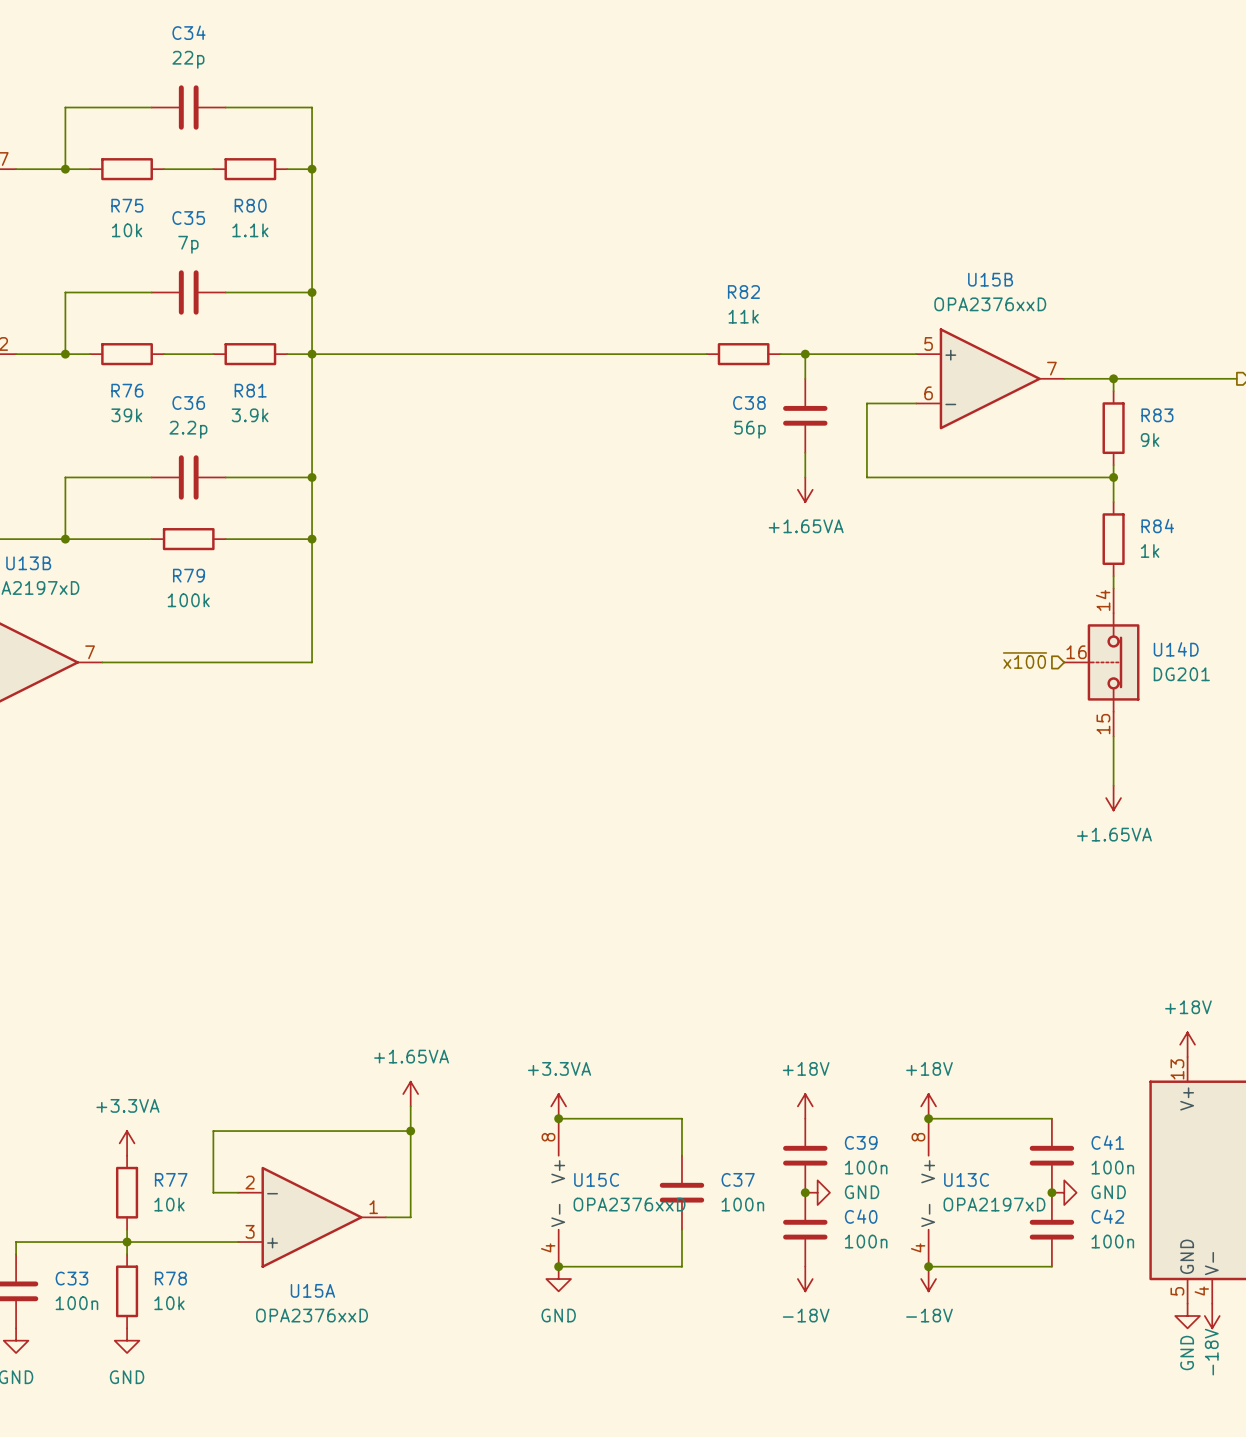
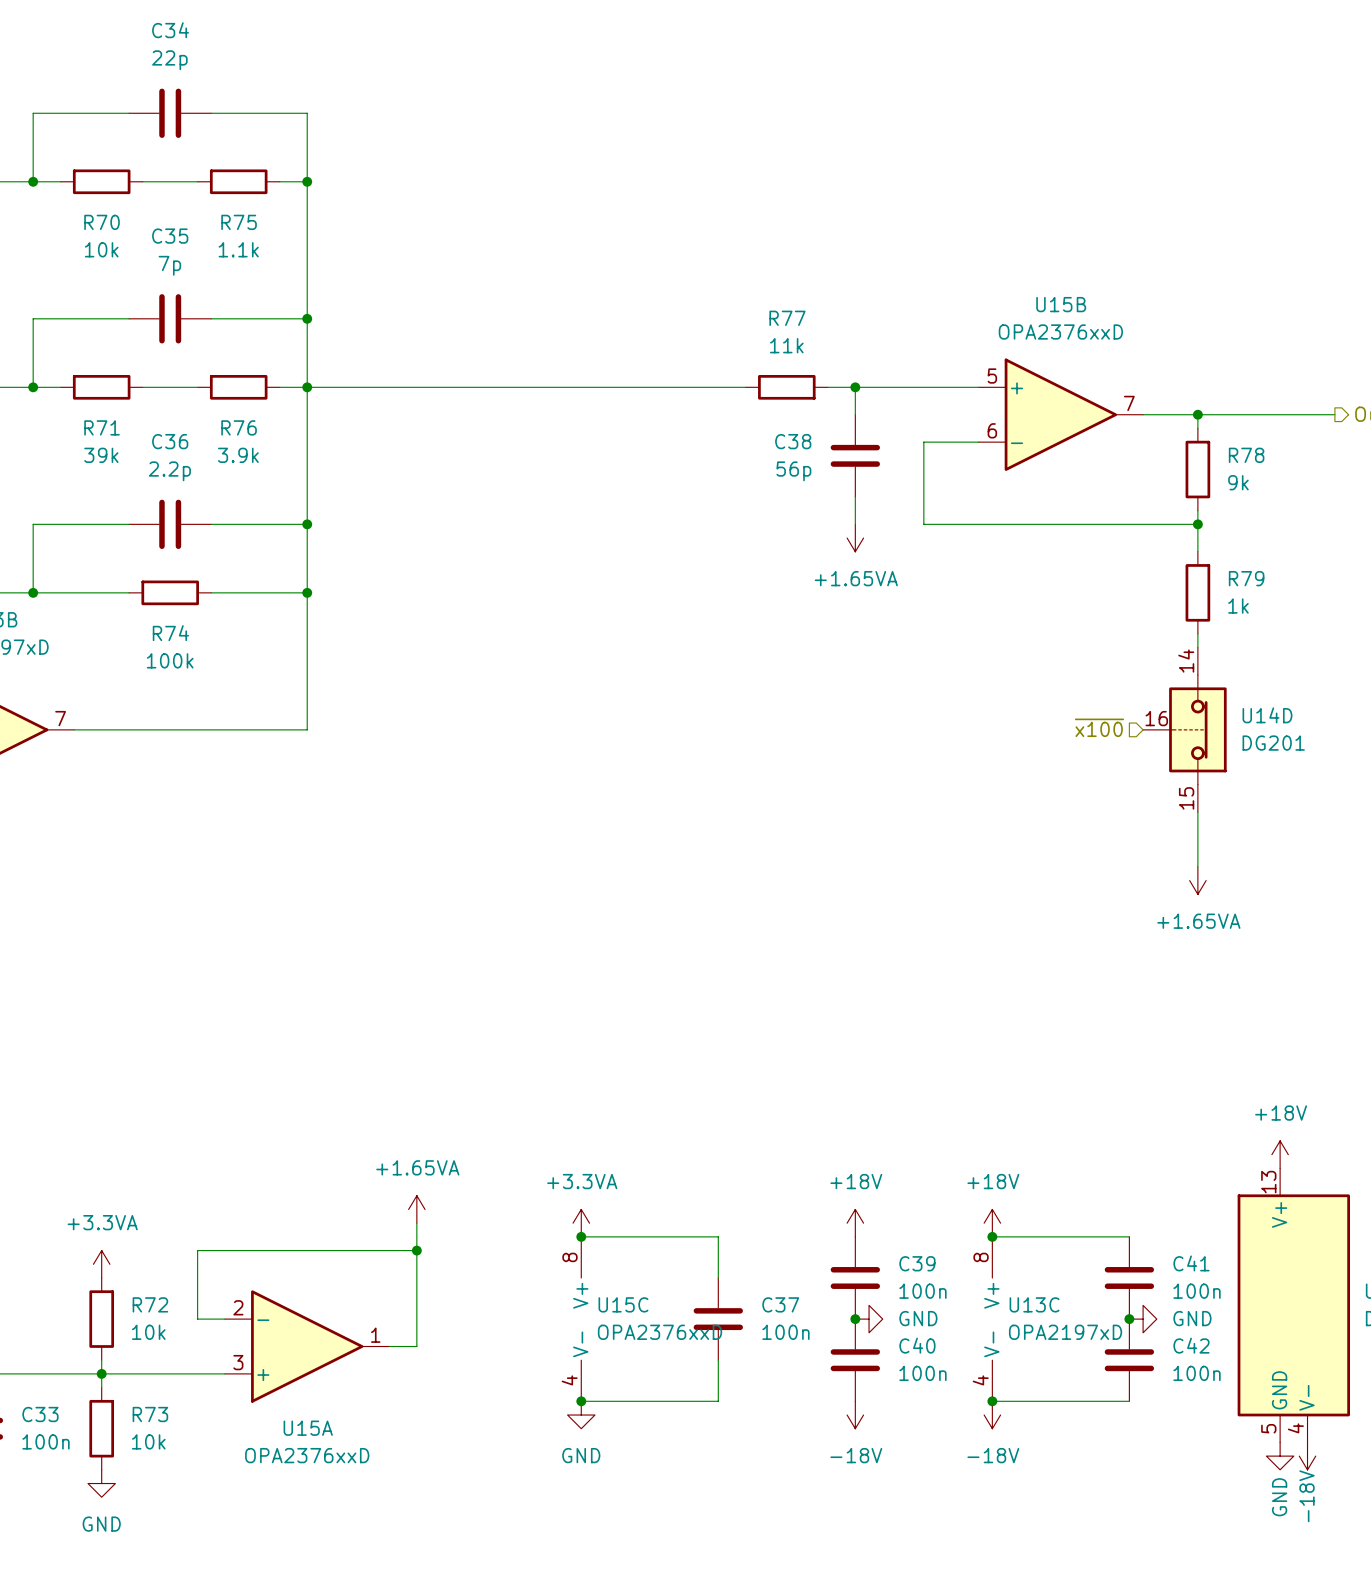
R75 name: R75 (127, 205) -> R70 (102, 222)
R80 name: R80 (250, 205) -> R75 (239, 222)
R82 name: R82 (743, 292) -> R77 (787, 318)
R76 name: R76 (127, 390) -> R71 (102, 427)
R81 name: R81 (250, 390) -> R76 (239, 427)
R83 name: R83 (1157, 415) -> R78 (1246, 455)
R84 name: R84 (1157, 526) -> R79 (1246, 578)
R79 name: R79 (189, 575) -> R74 (170, 633)
R77 name: R77 (171, 1179) -> R72 (150, 1304)
R78 name: R78 (170, 1278) -> R73 (150, 1414)

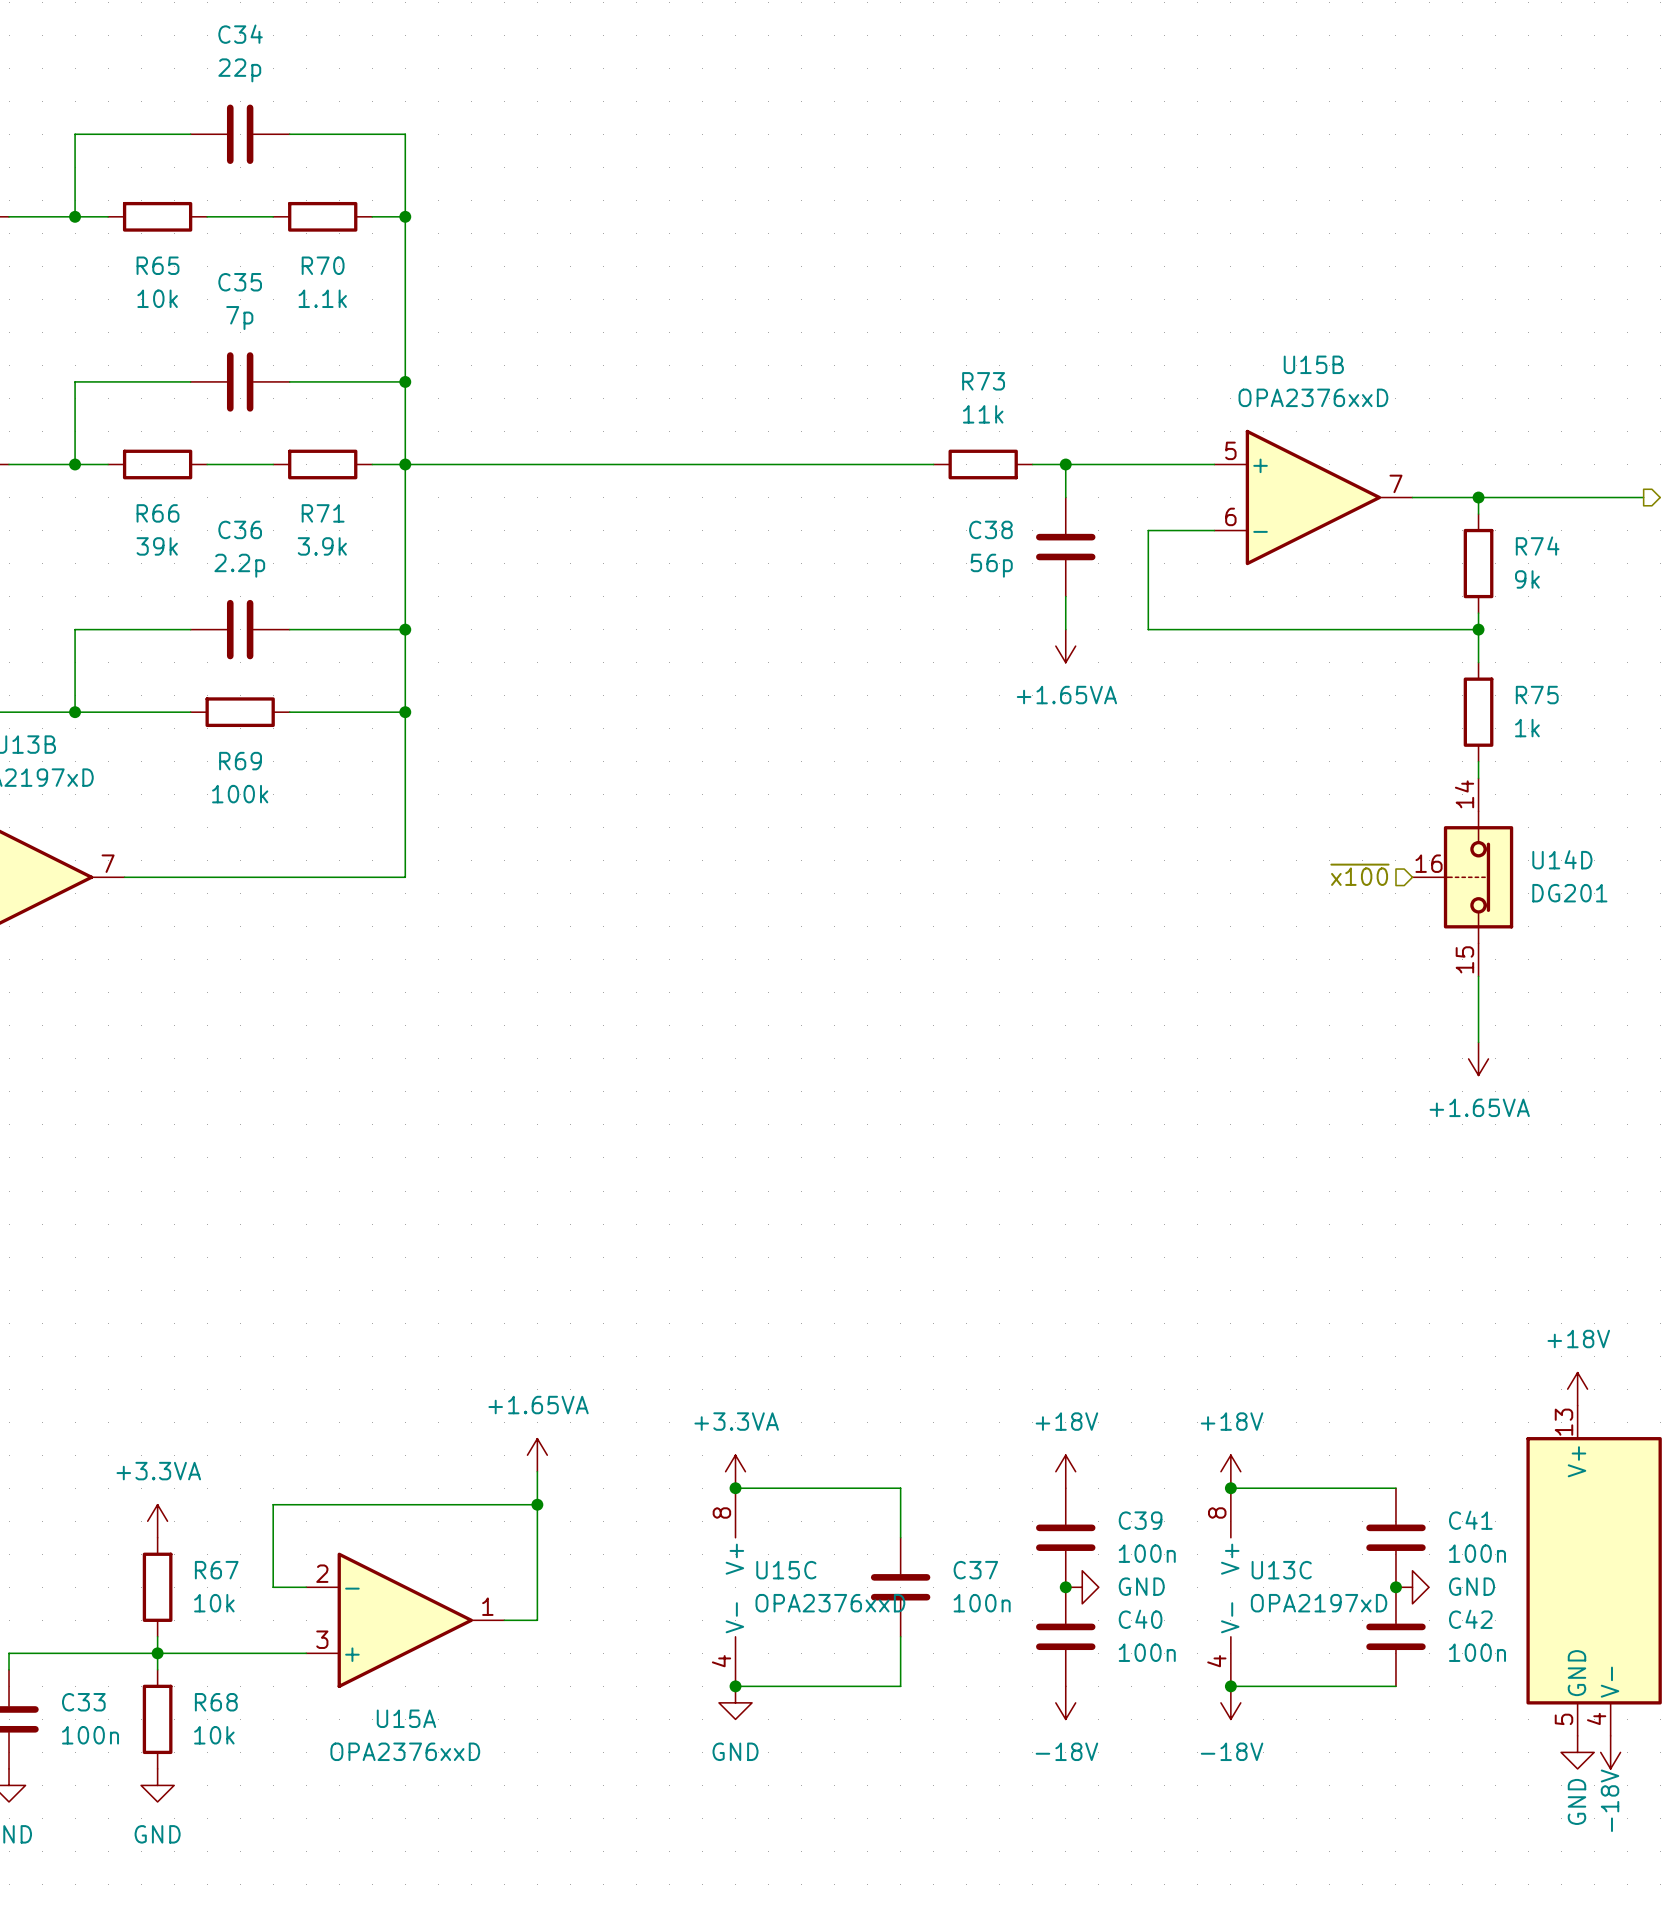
R70 name: R70 (102, 222) -> R65 (158, 265)
R75 name: R75 (239, 222) -> R70 (323, 265)
R77 name: R77 (787, 318) -> R73 (983, 381)
R71 name: R71 (102, 427) -> R66 (158, 513)
R76 name: R76 (239, 427) -> R71 (323, 513)
R78 name: R78 (1246, 455) -> R74 (1537, 546)
R79 name: R79 (1246, 578) -> R75 (1537, 695)
R74 name: R74 (170, 633) -> R69 (240, 761)
R72 name: R72 (150, 1304) -> R67 (216, 1570)
R73 name: R73 (150, 1414) -> R68 (216, 1702)

